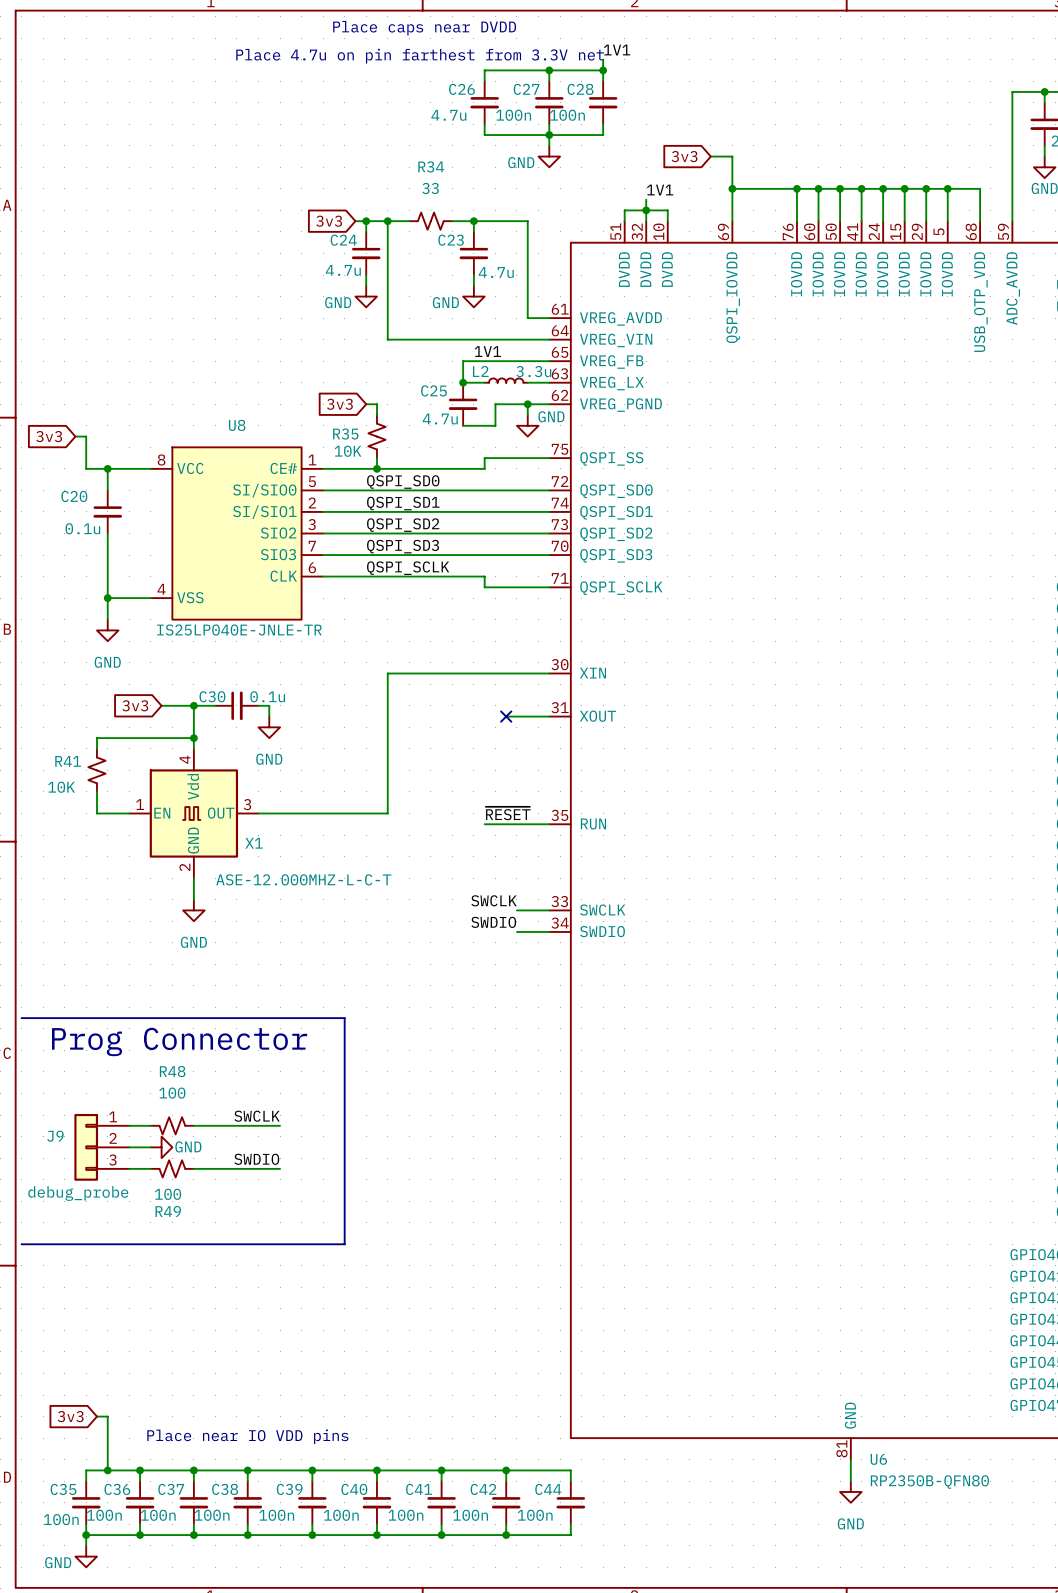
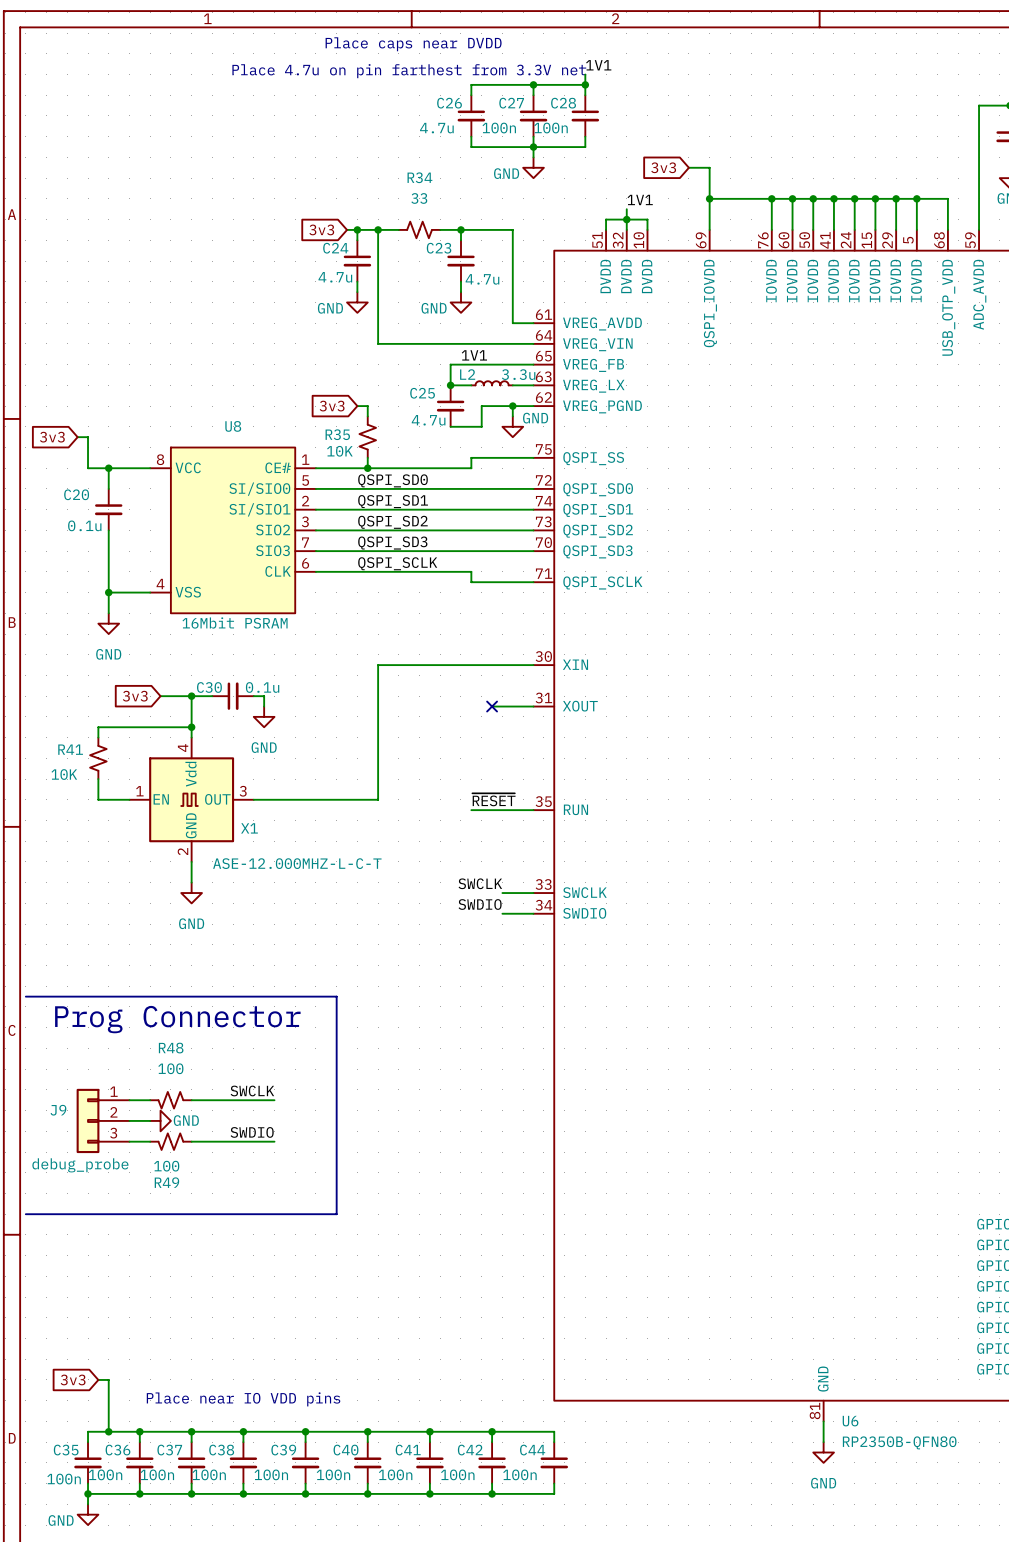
U8 value: IS25LP040E-JNLE-TR (239, 630) -> 16Mbit PSRAM (235, 622)

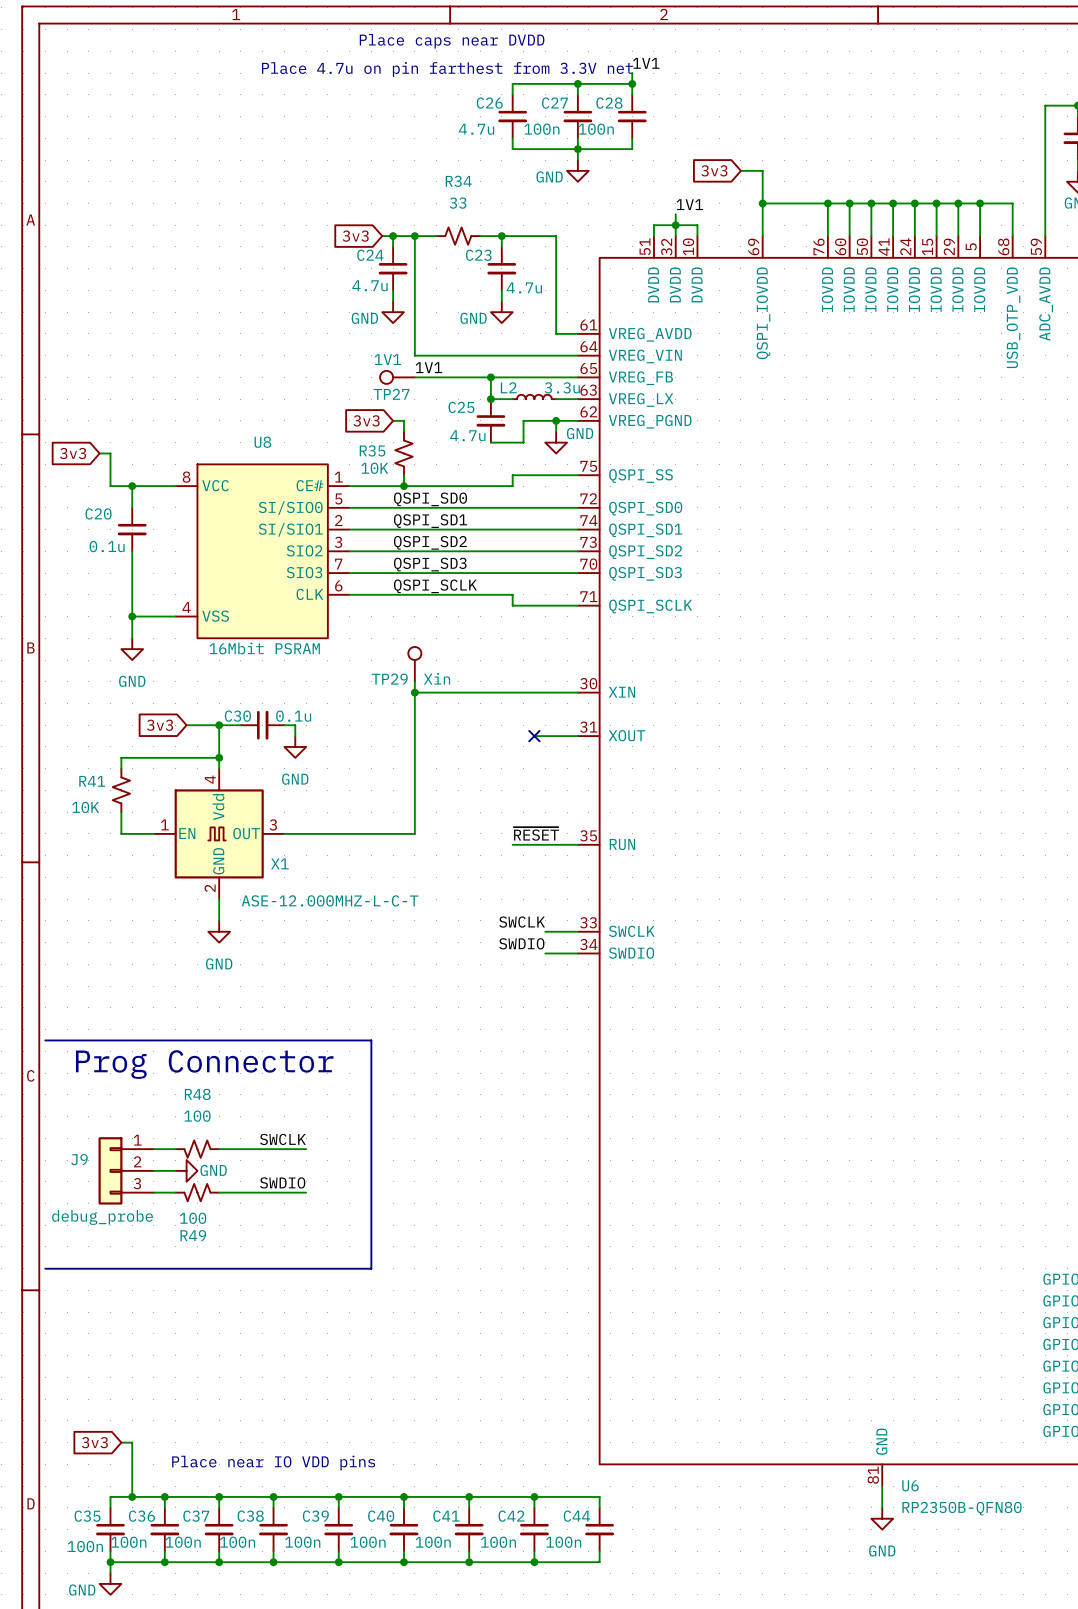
label position: 1V1 (474, 355) -> 1V1 (428, 367)
TP27: none -> 1V1 (397, 377)
wire: none -> (414, 377) (490, 377)
junction: none -> (490, 377)
TP29: none -> Xin (414, 664)
wire: none -> (414, 681) (414, 692)
junction: none -> (414, 692)

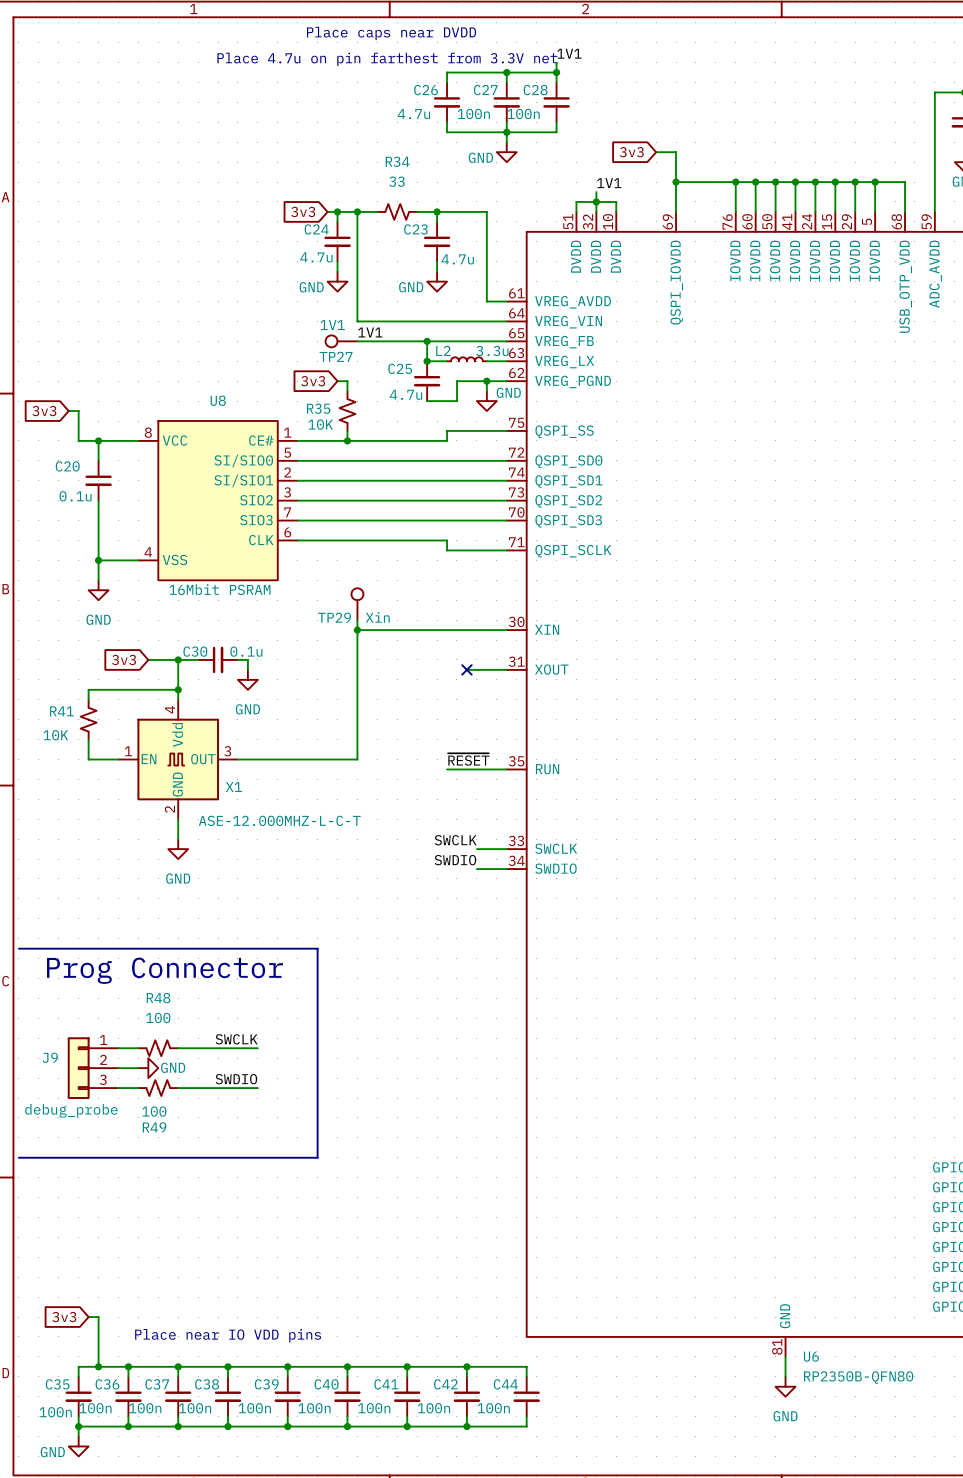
label: QSPI_SD0 (430, 499) -> none
label: QSPI_SD1 (430, 521) -> none
label: QSPI_SD2 (430, 542) -> none
label: QSPI_SD3 (430, 564) -> none
label: QSPI_SCLK (435, 586) -> none

